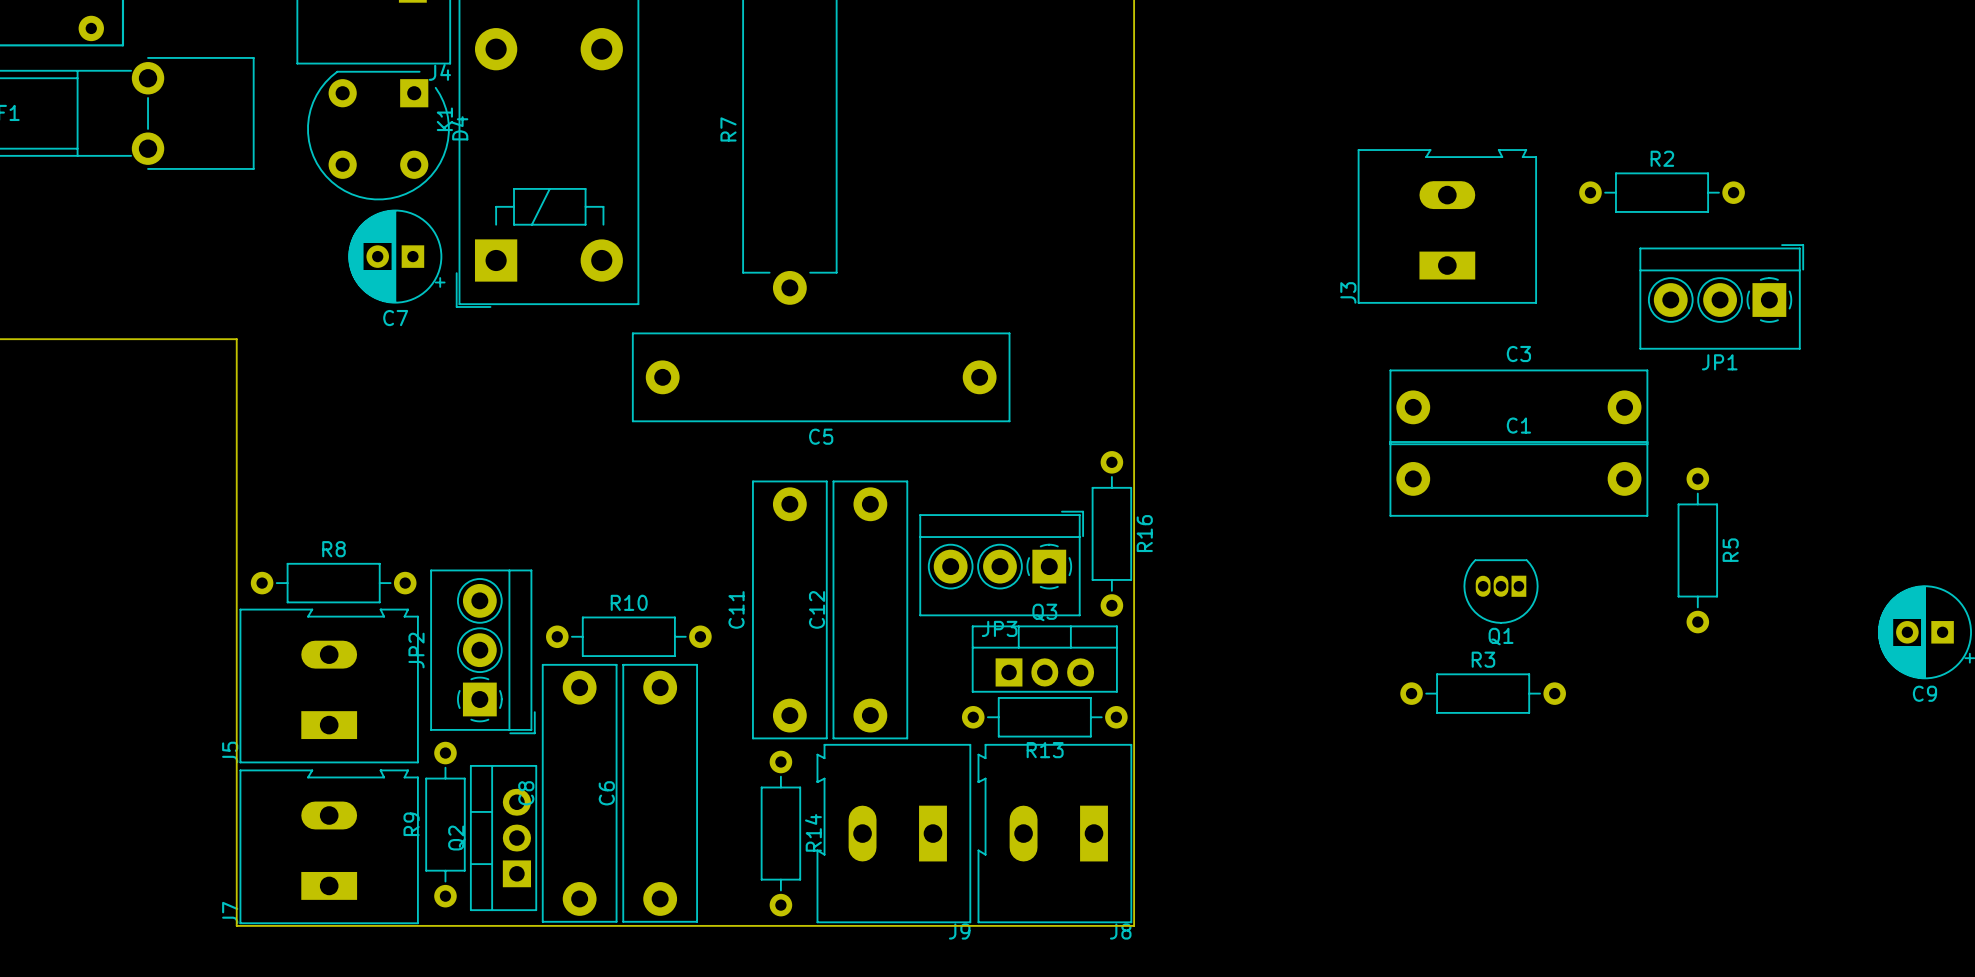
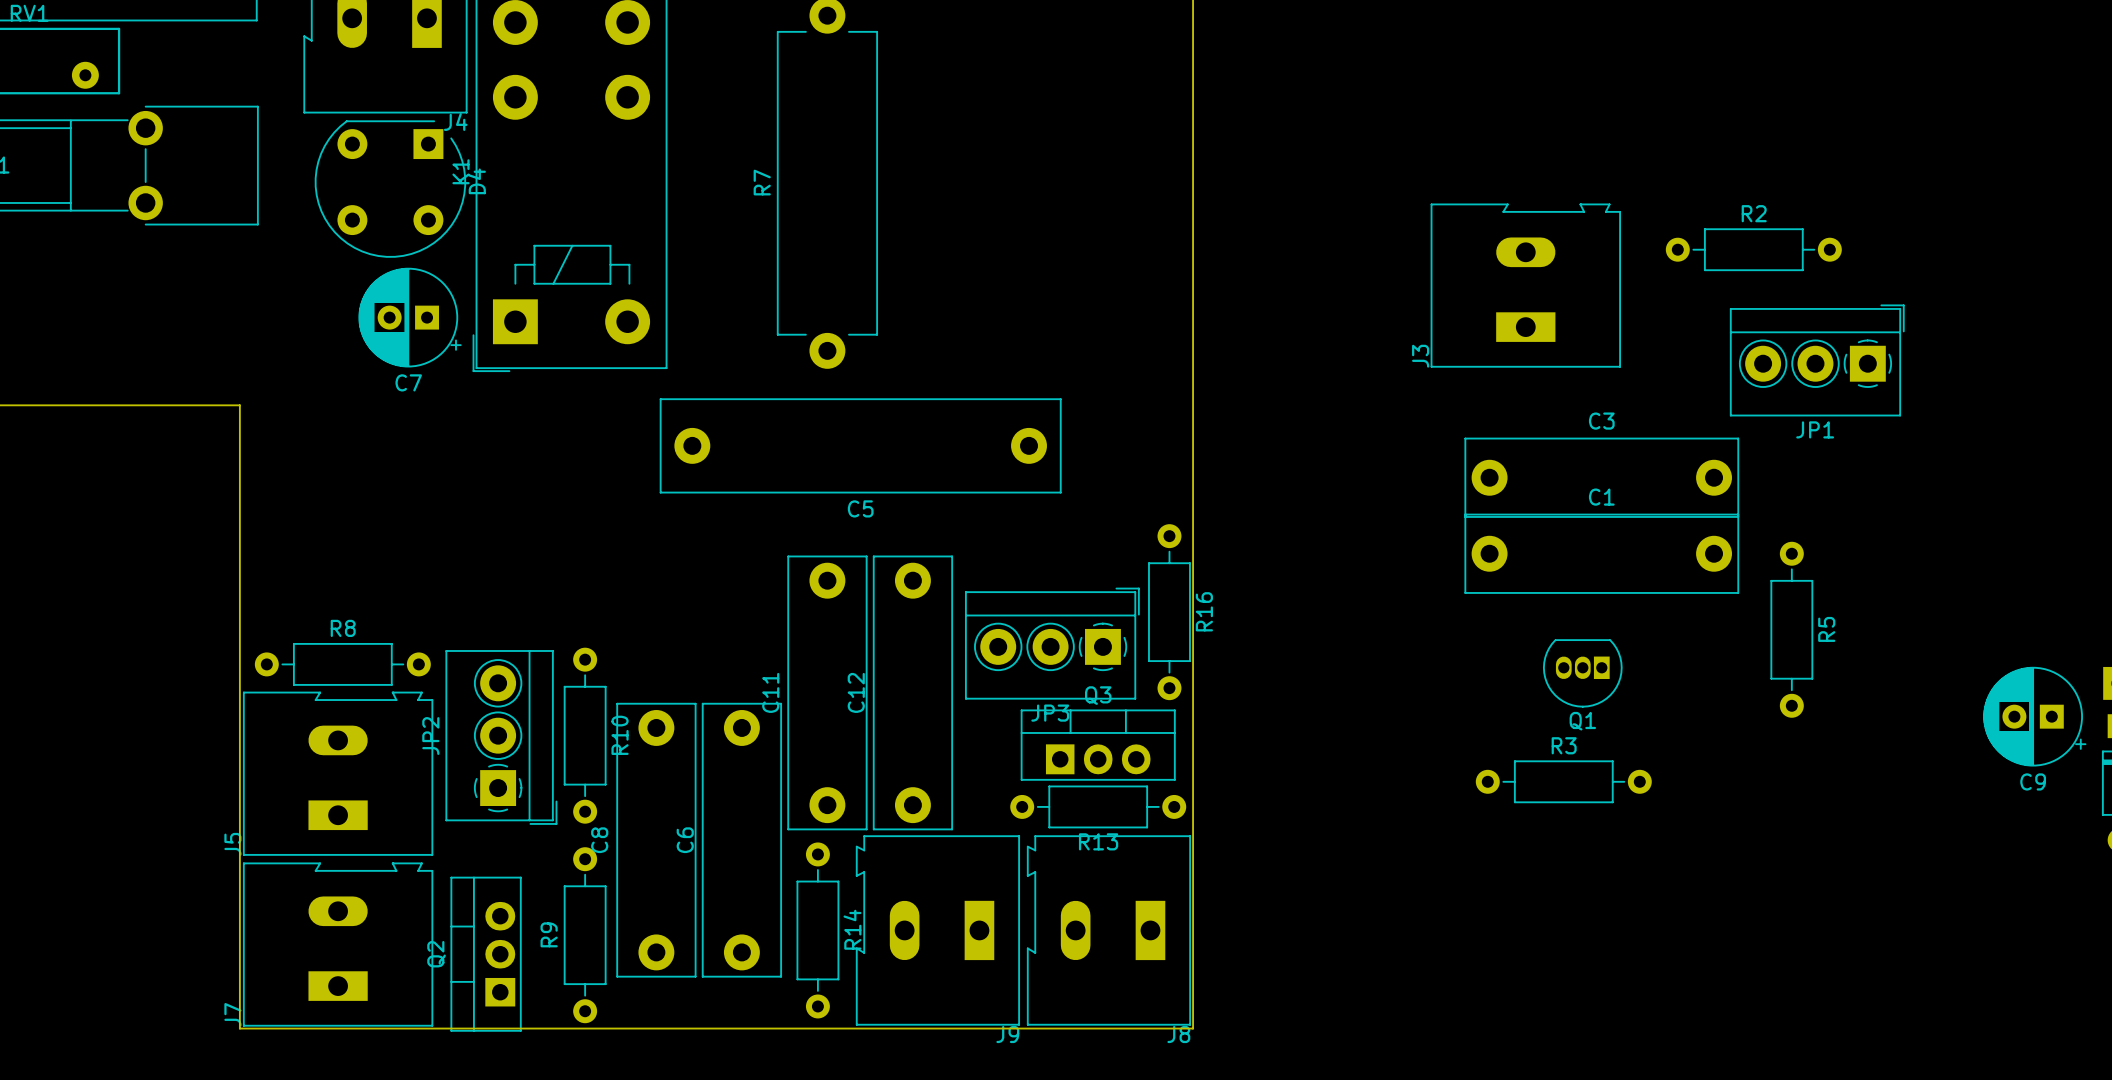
R10 rotation: 0° (628, 636) -> 90° clockwise (585, 735)
C8 position: (579, 793) -> (656, 840)
C6 position: (660, 793) -> (741, 840)
R9 position: (445, 824) -> (585, 935)
Q2 position: (503, 838) -> (486, 954)

